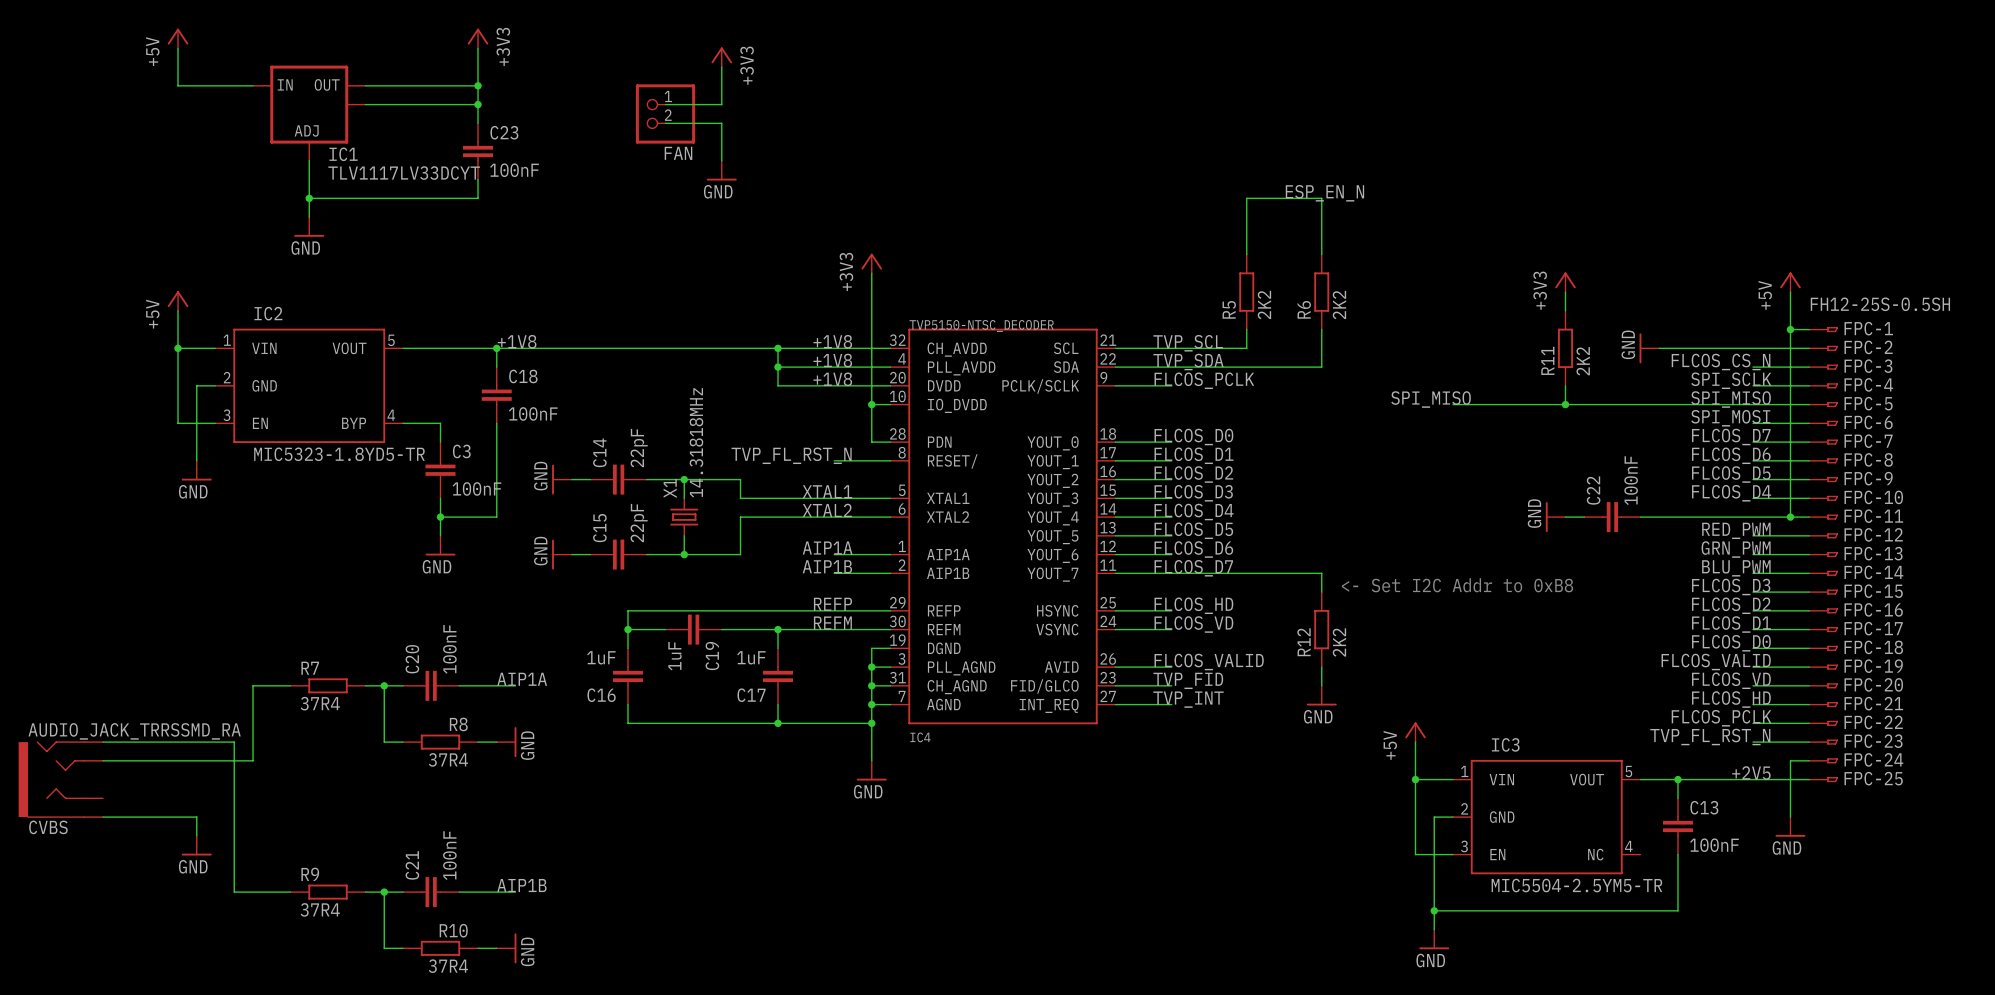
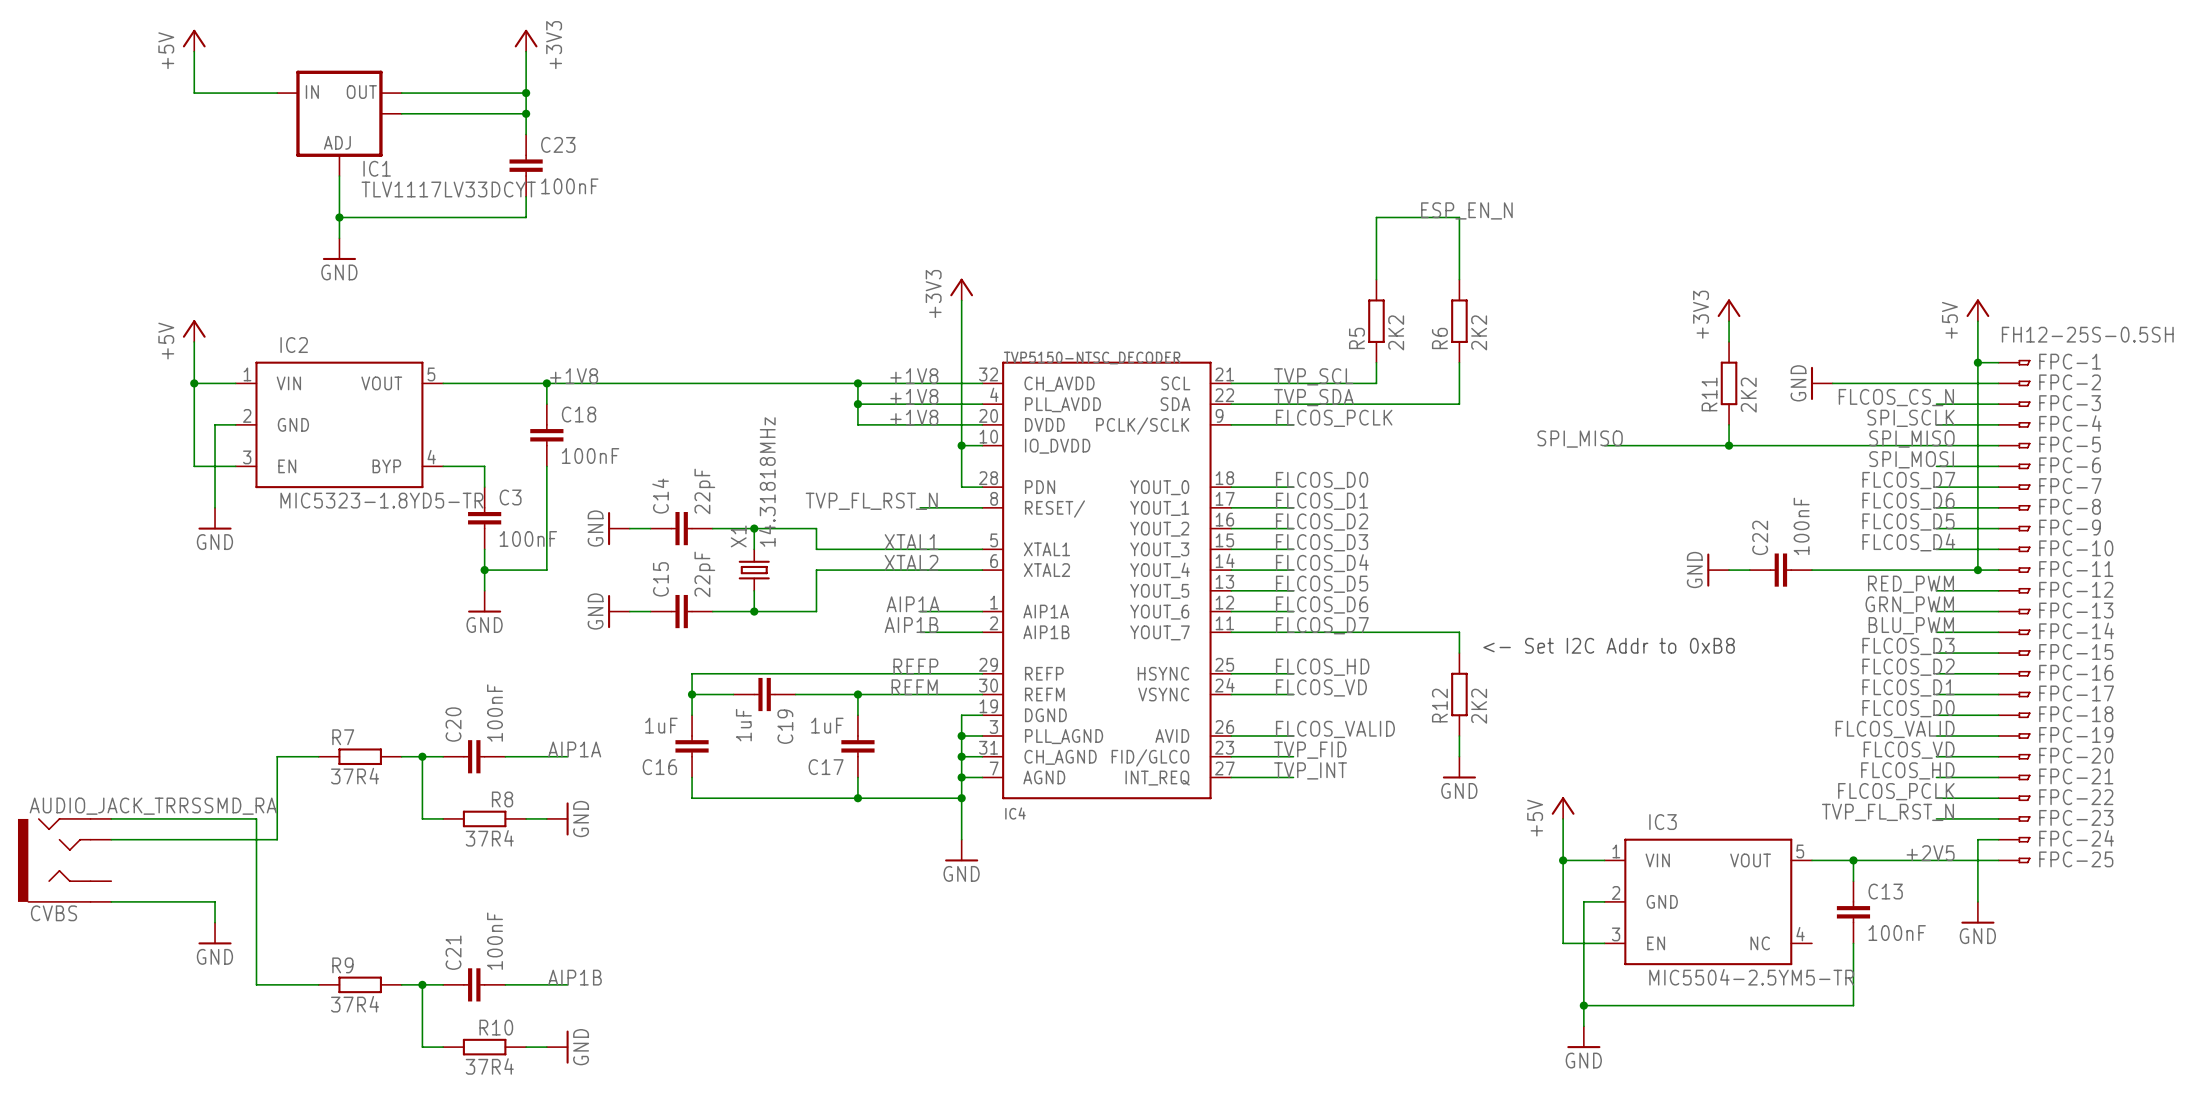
power symbol: +3V3 (721, 57) -> none
wire: (721, 67) (721, 104) (665, 104) -> none
FAN: (665, 113) -> none
wire: (665, 123) (721, 123) (721, 160) -> none
power symbol: GND (721, 170) -> none

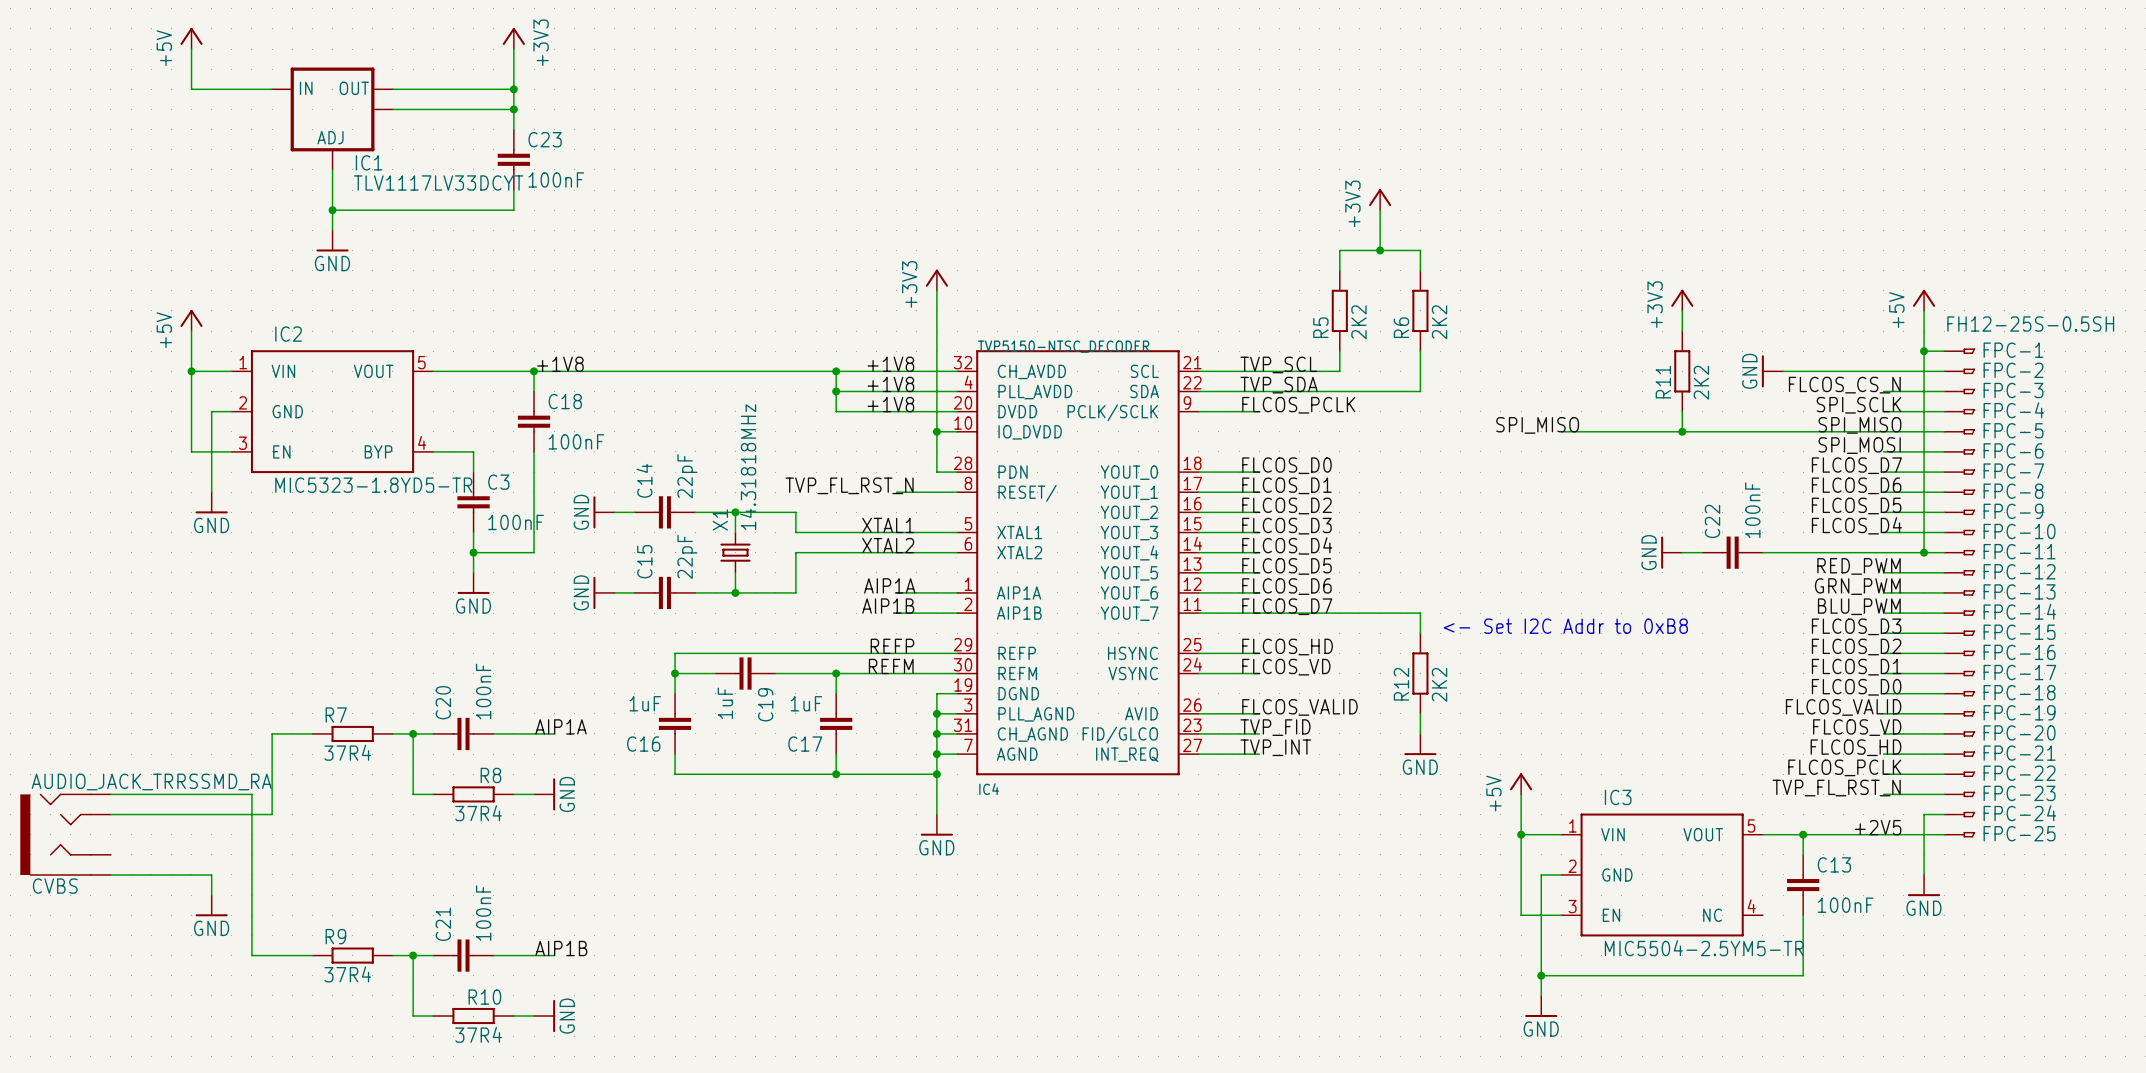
power symbol: none -> +3V3 (1380, 199)
label: ESP_EN_N (1466, 210) -> none
wire: none -> (1380, 210) (1380, 250)
wire: (1376, 258) (1376, 217) (1459, 217) (1459, 258) -> (1339, 250) (1420, 250)
junction: none -> (1380, 250)

